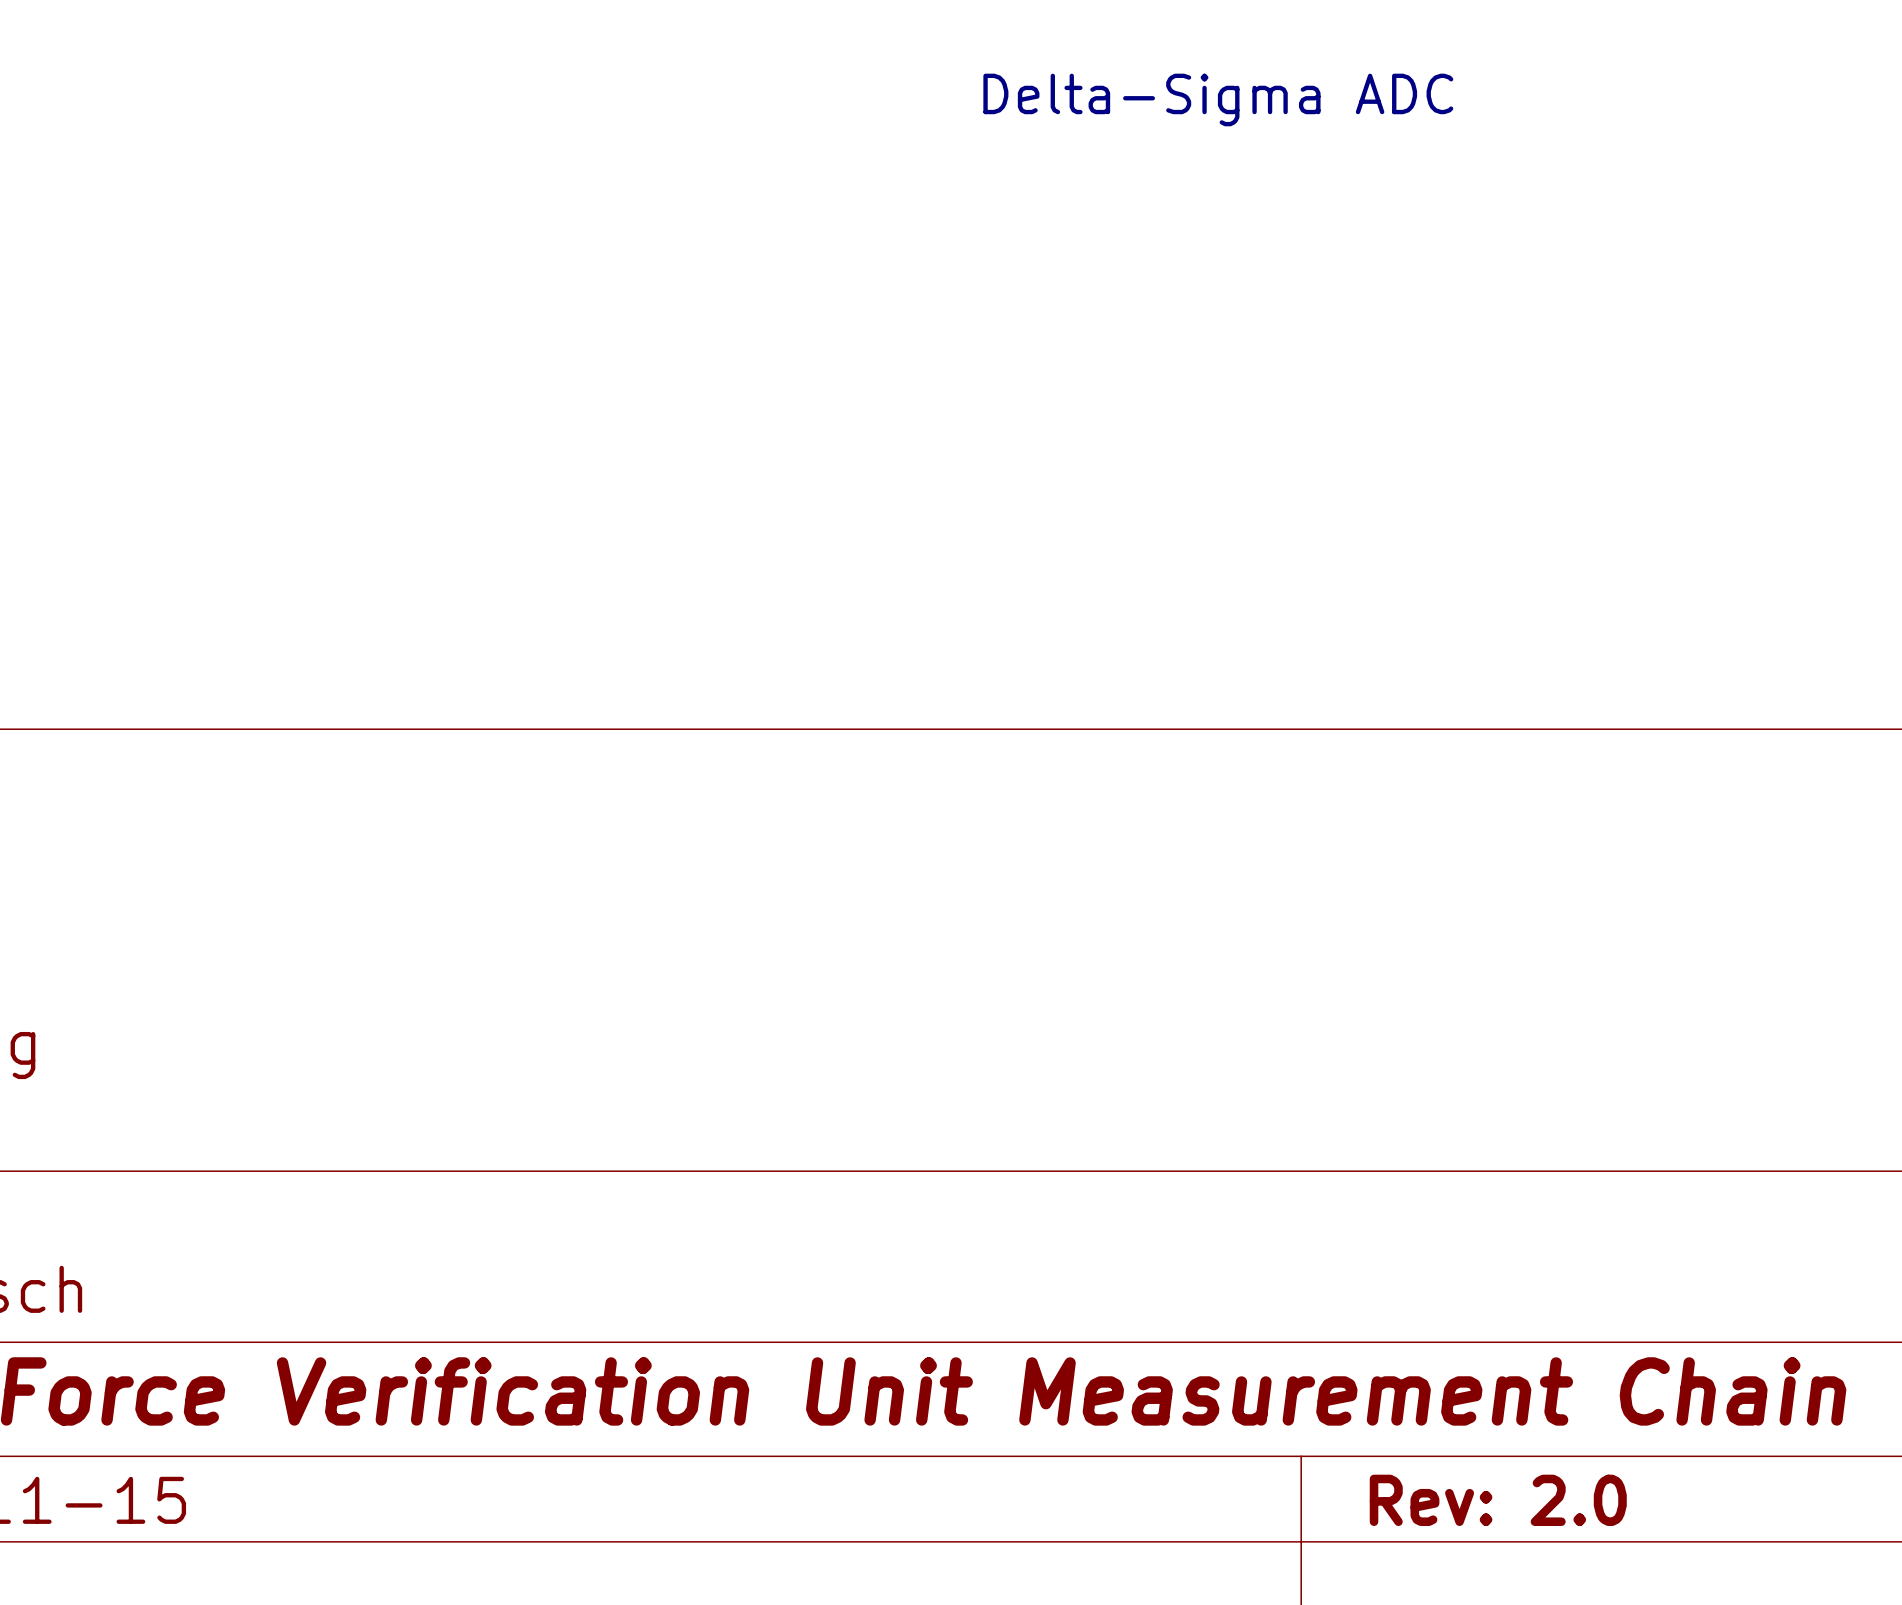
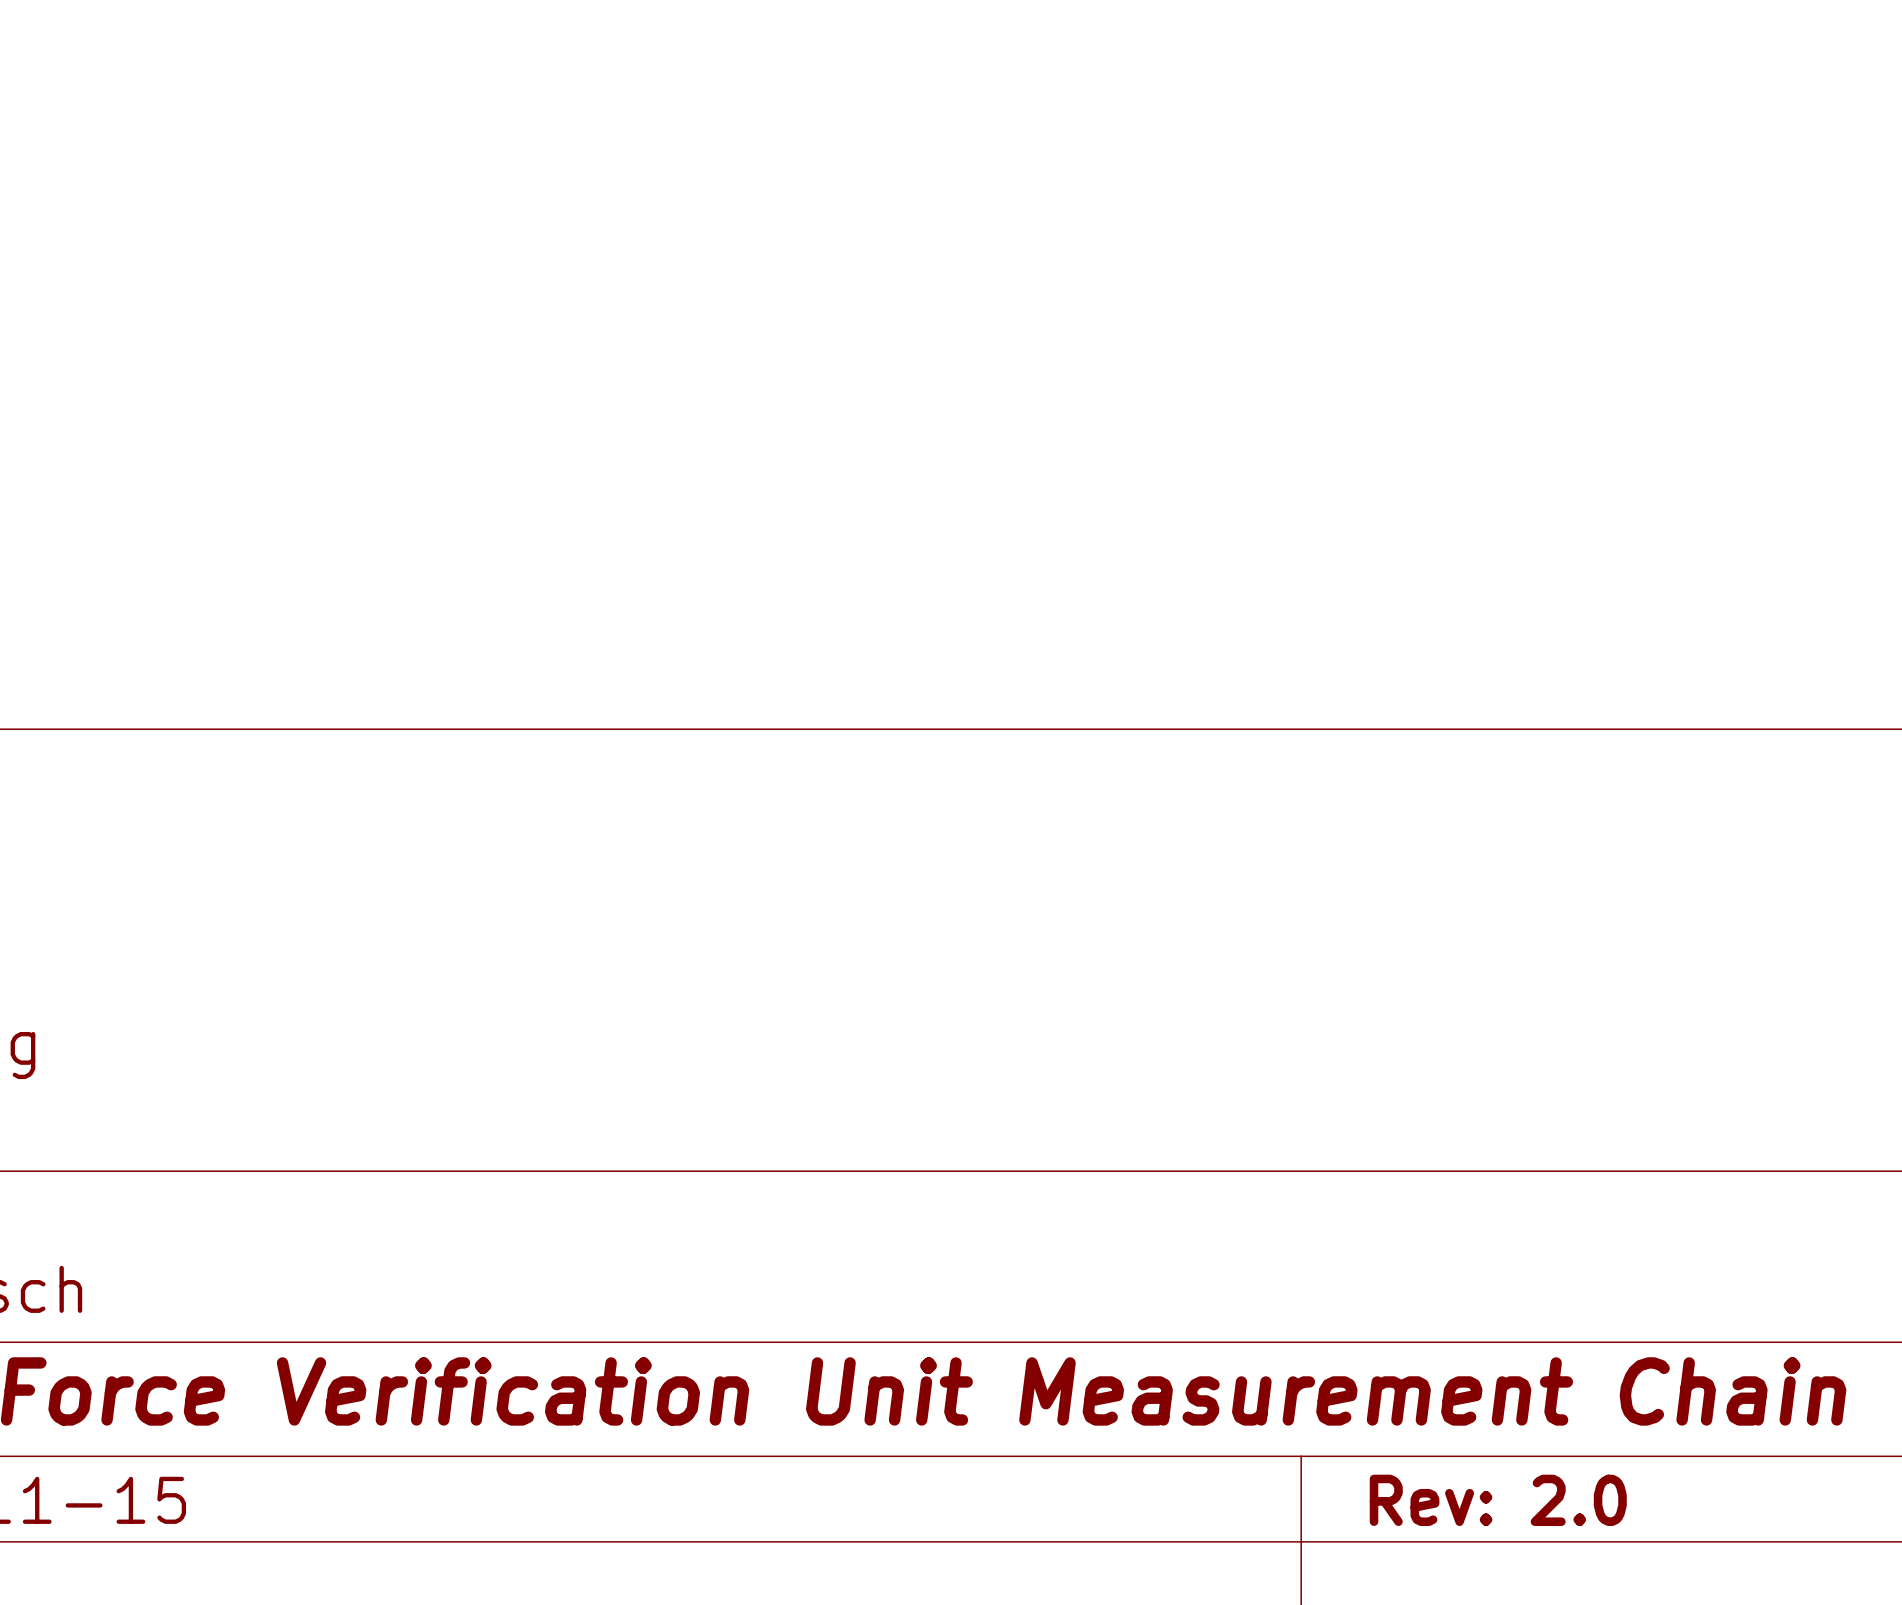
text: Delta-Sigma ADC (1218, 99) -> none

